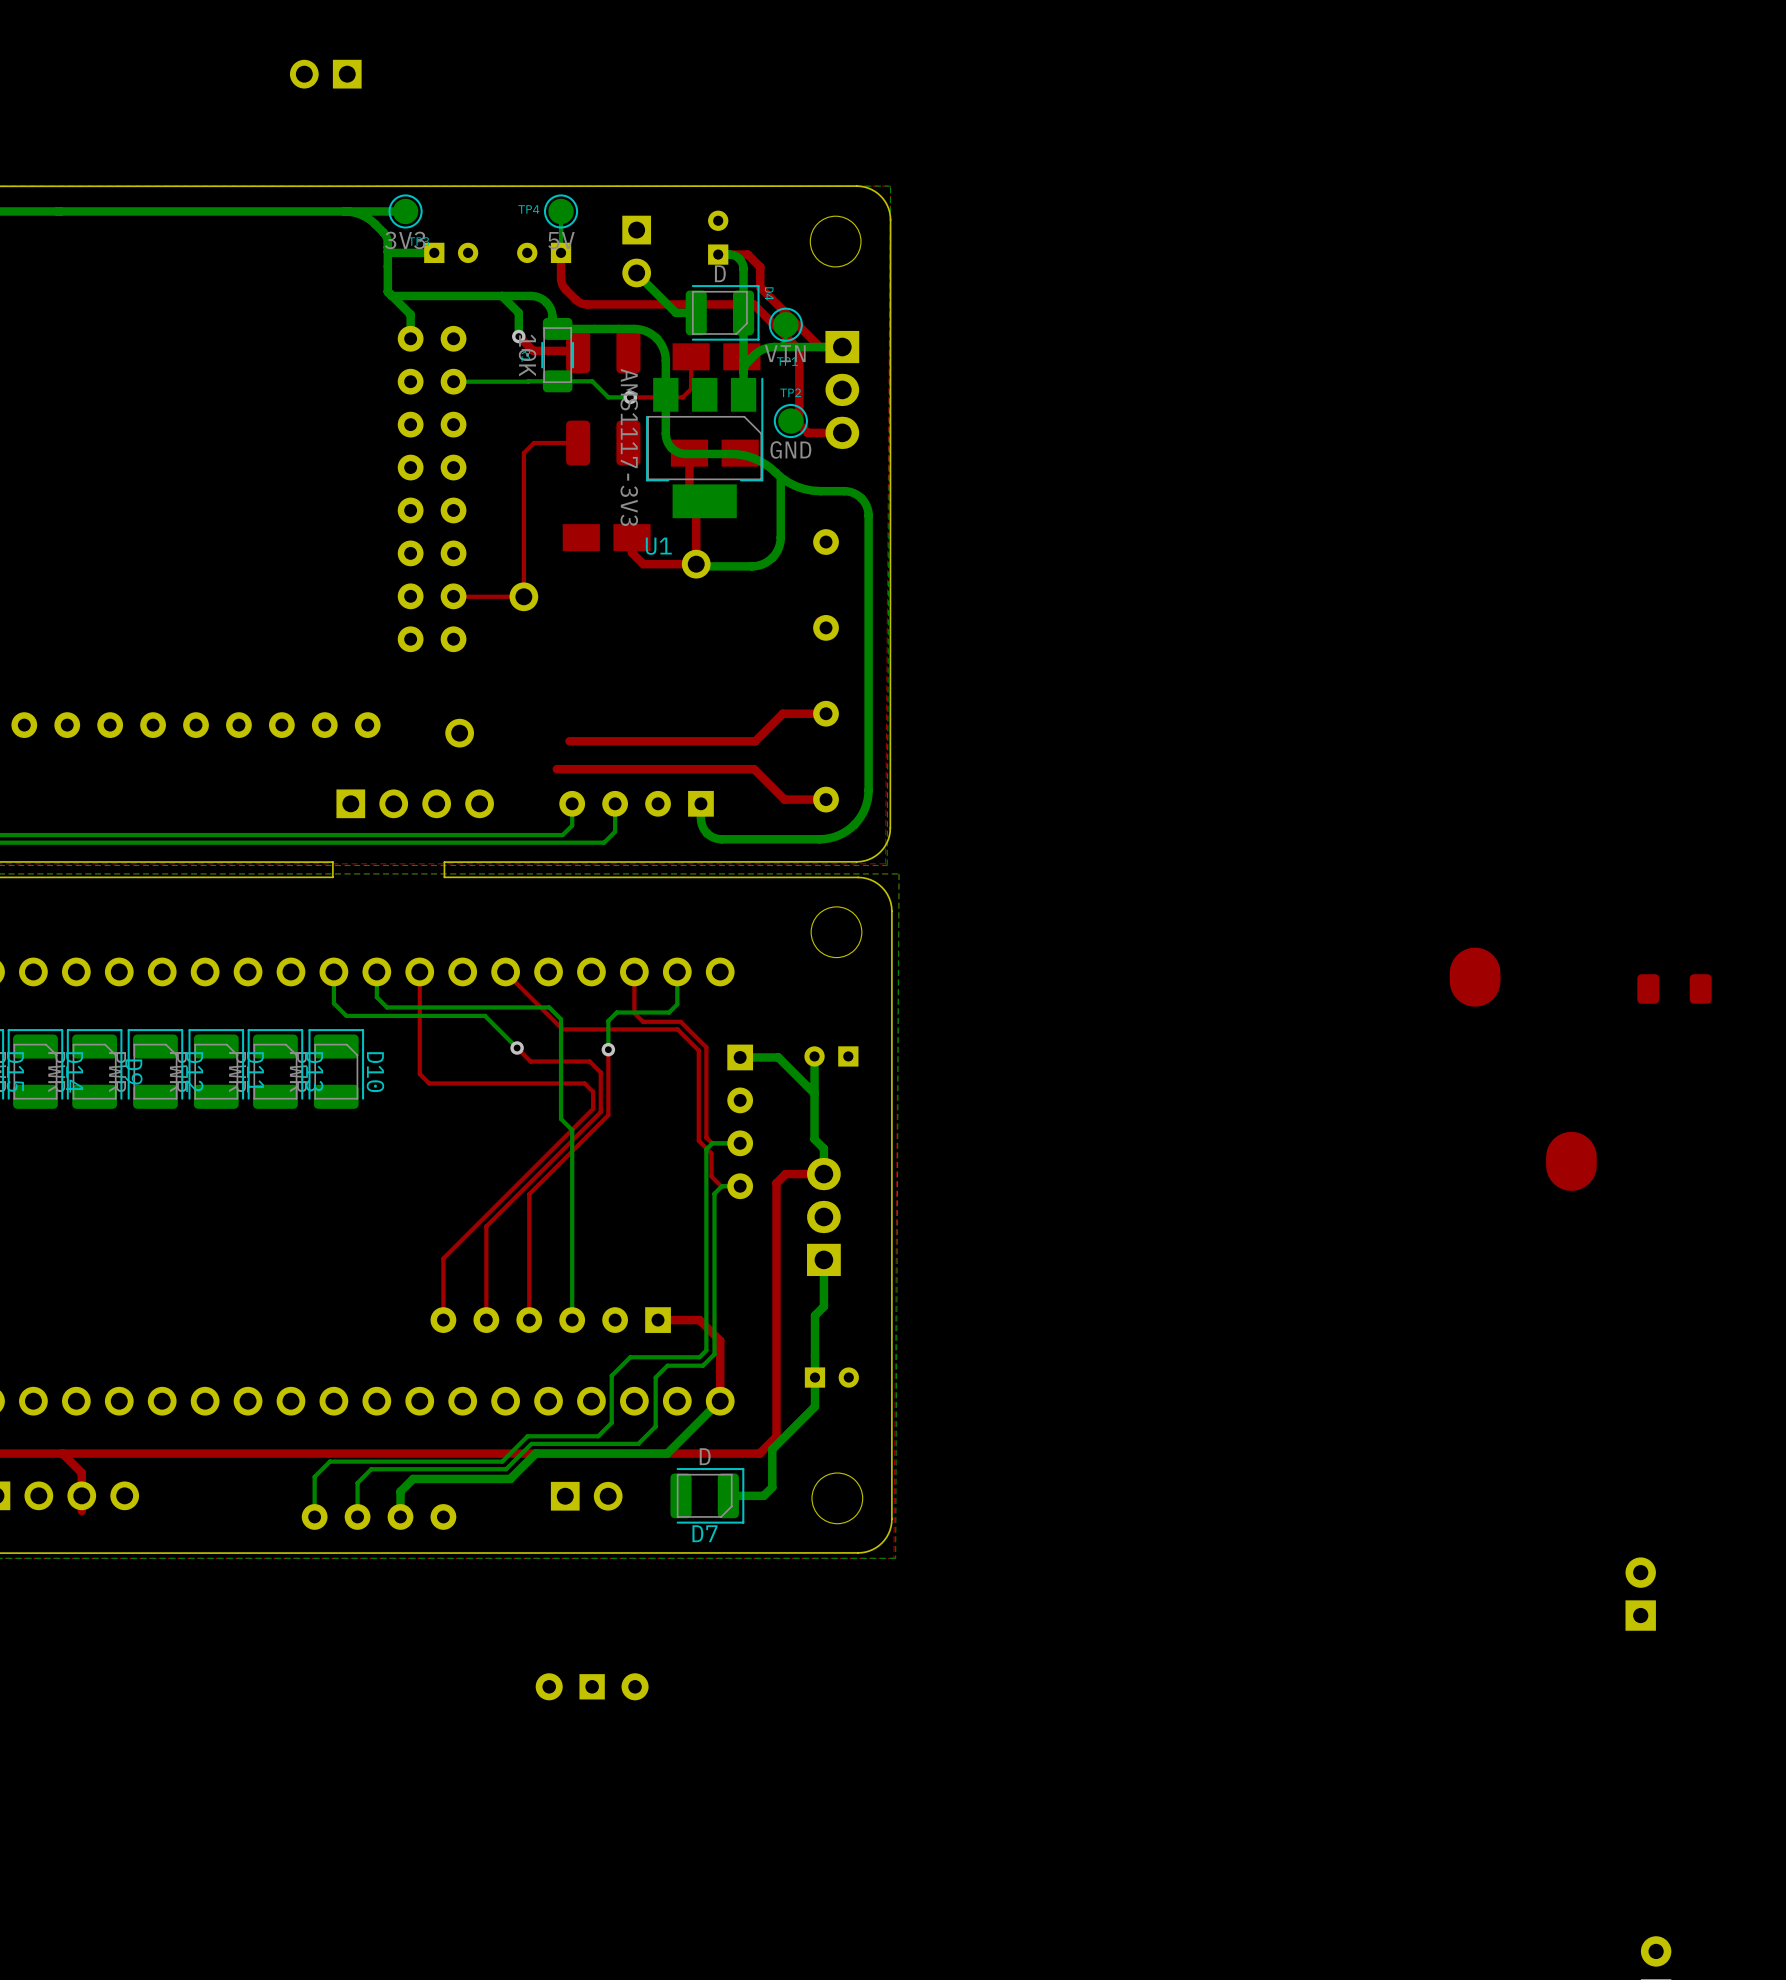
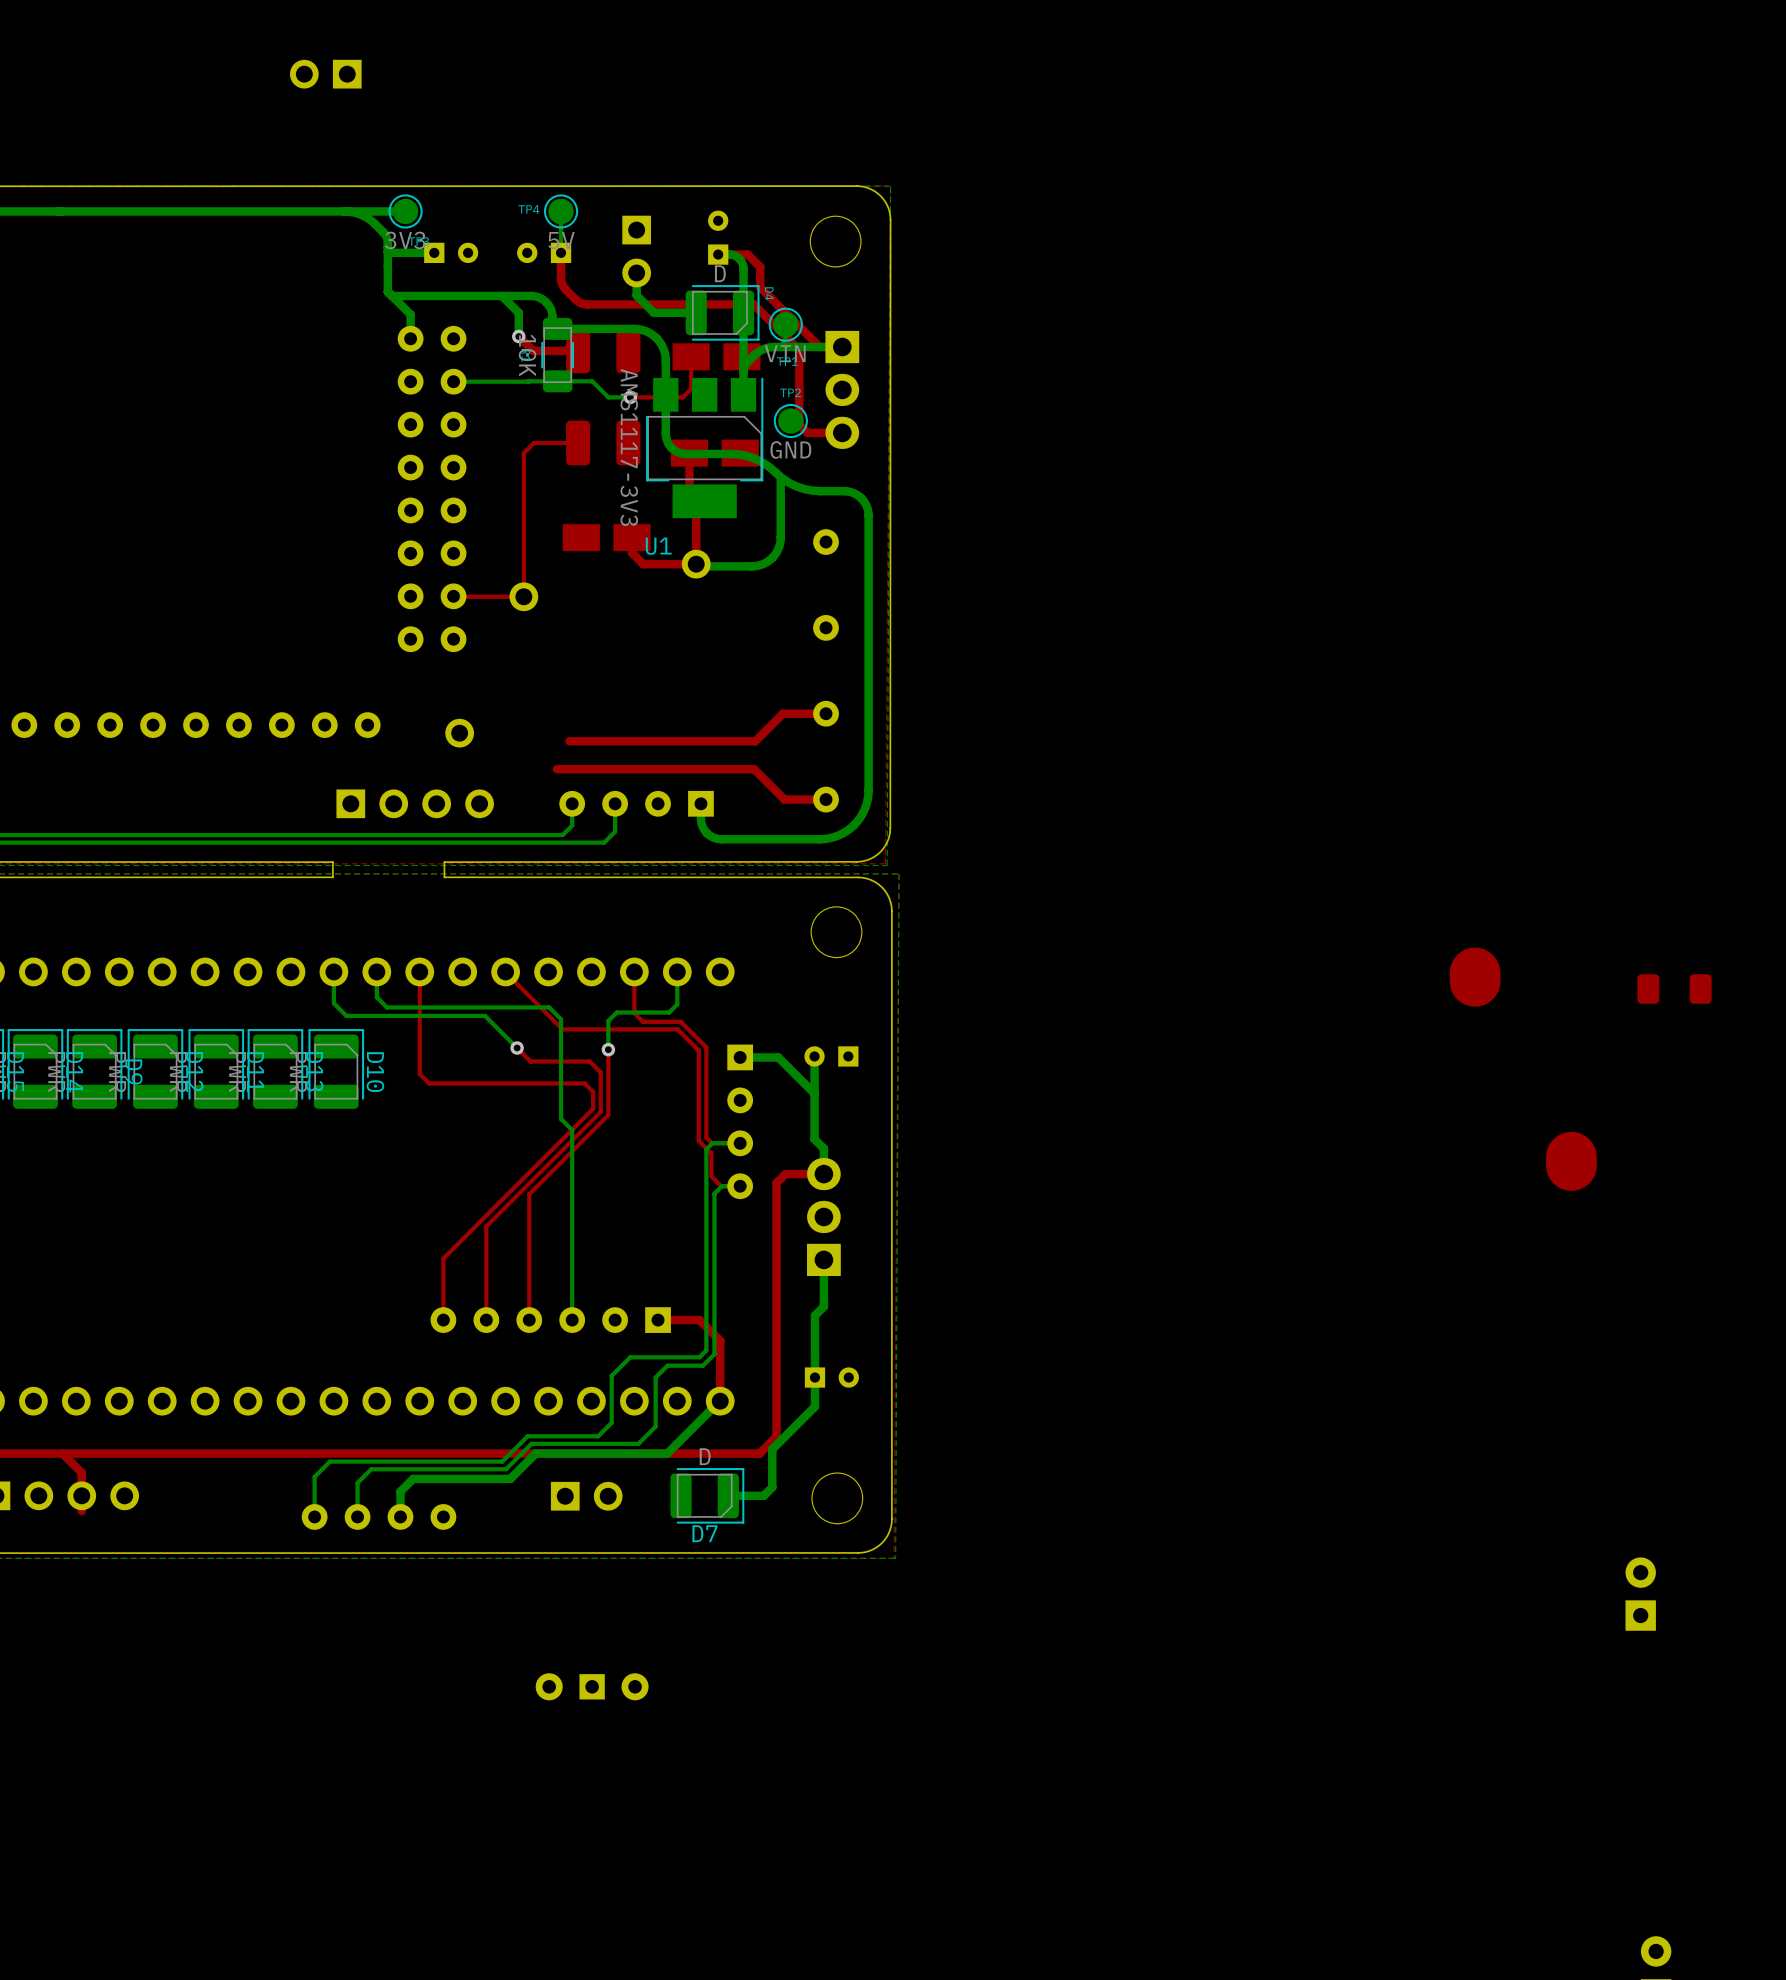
bottom track: (636, 273) (675, 312) -> (636, 273) (636, 295) (653, 312) (675, 312)

